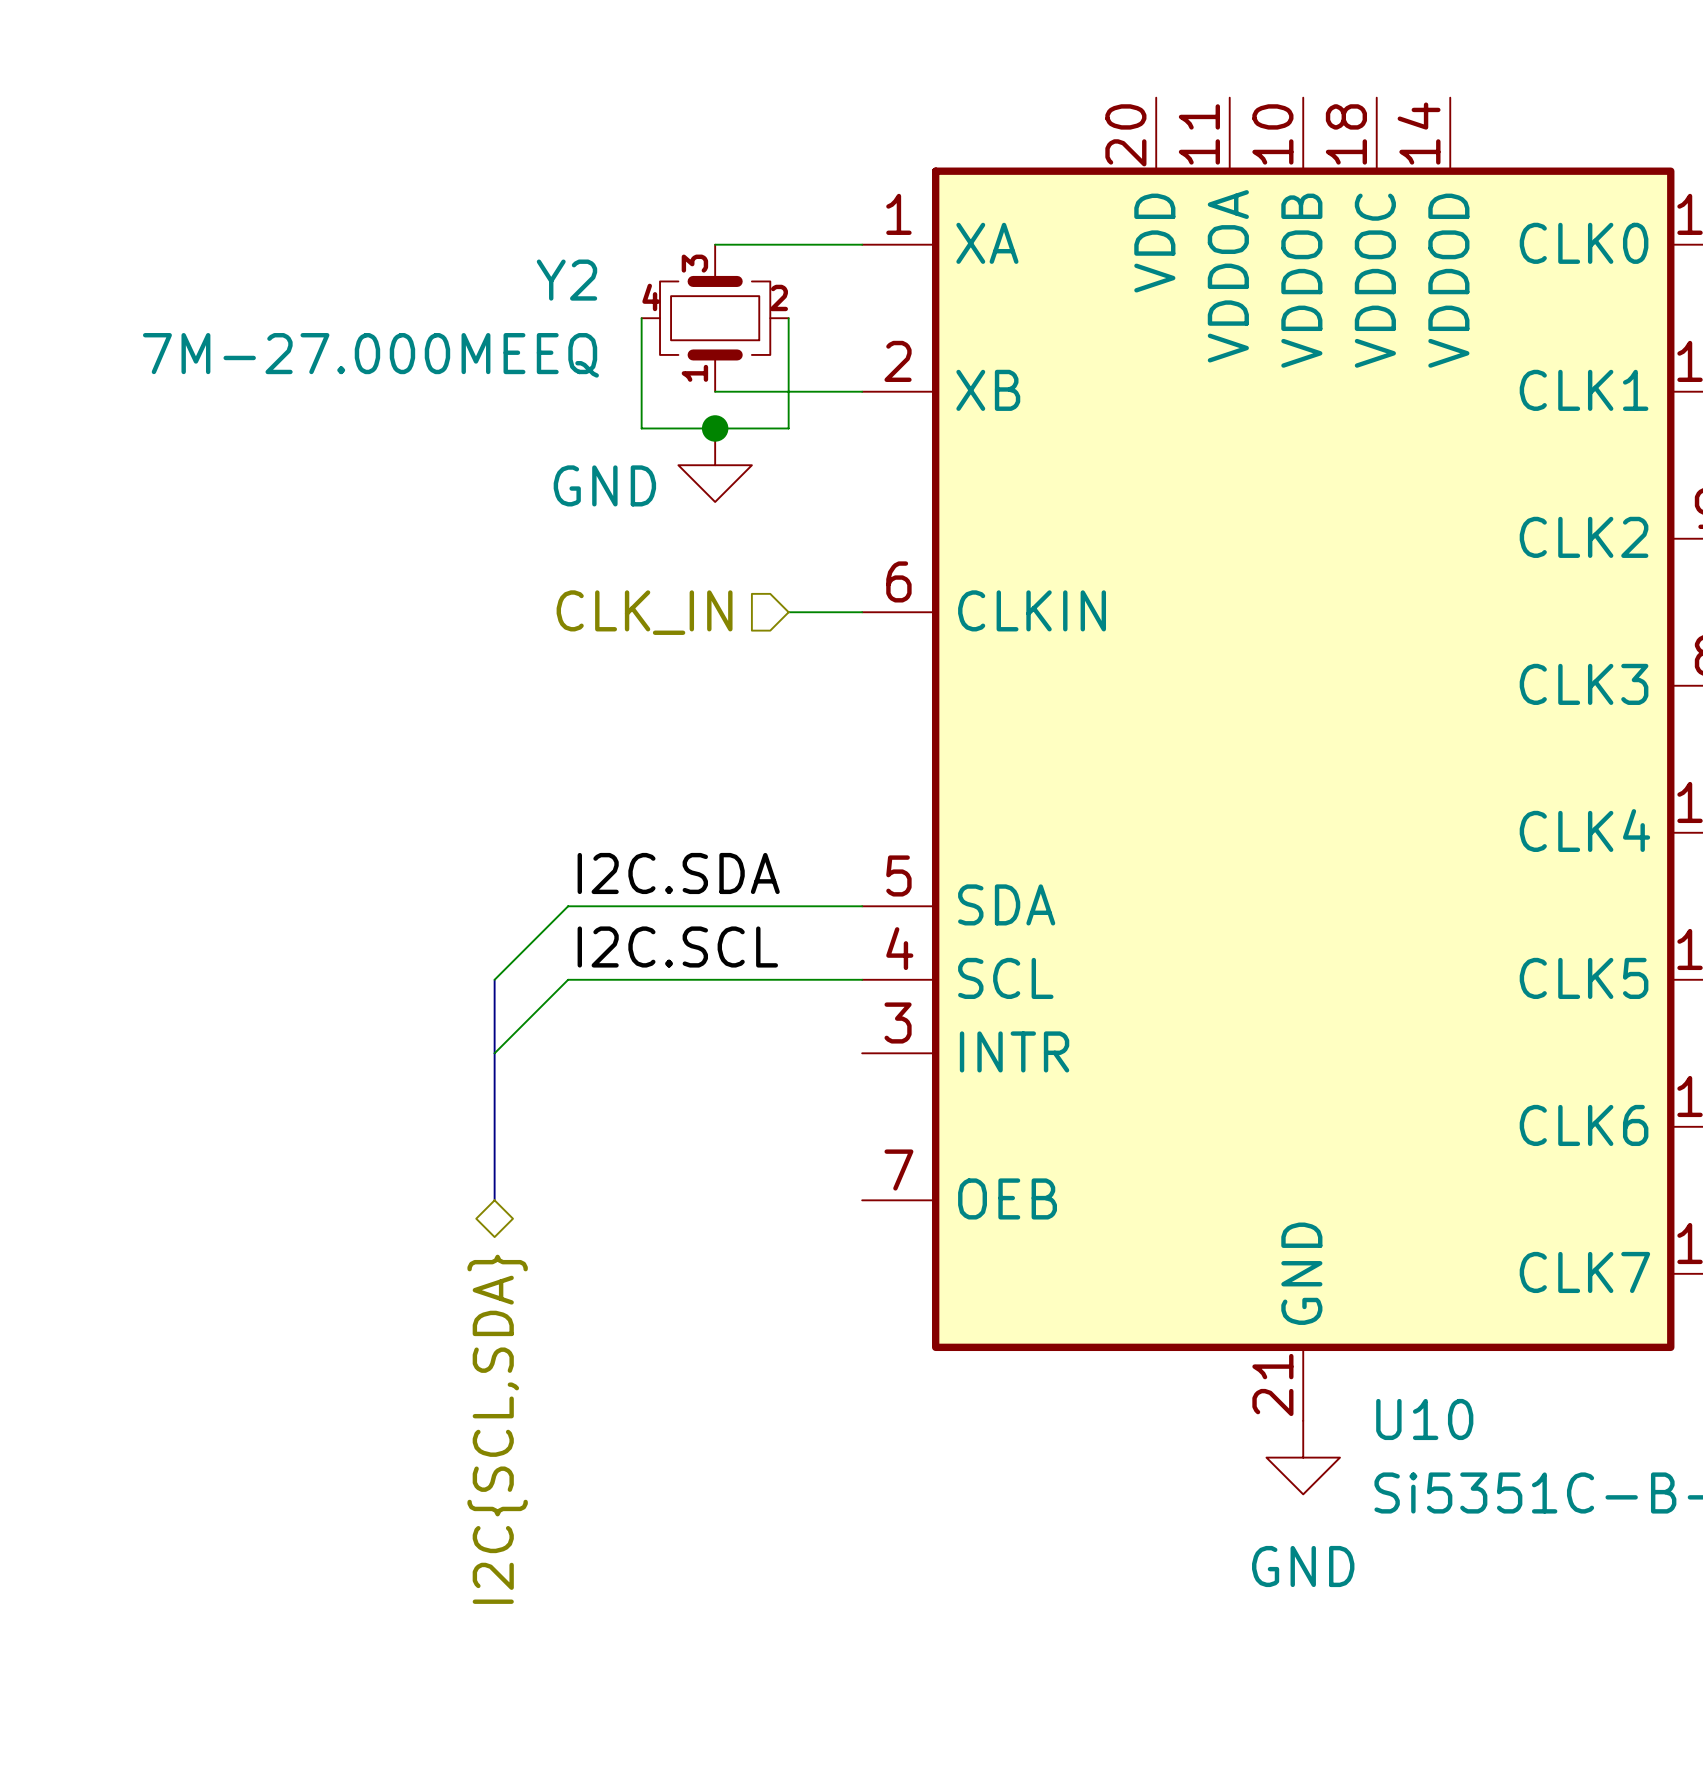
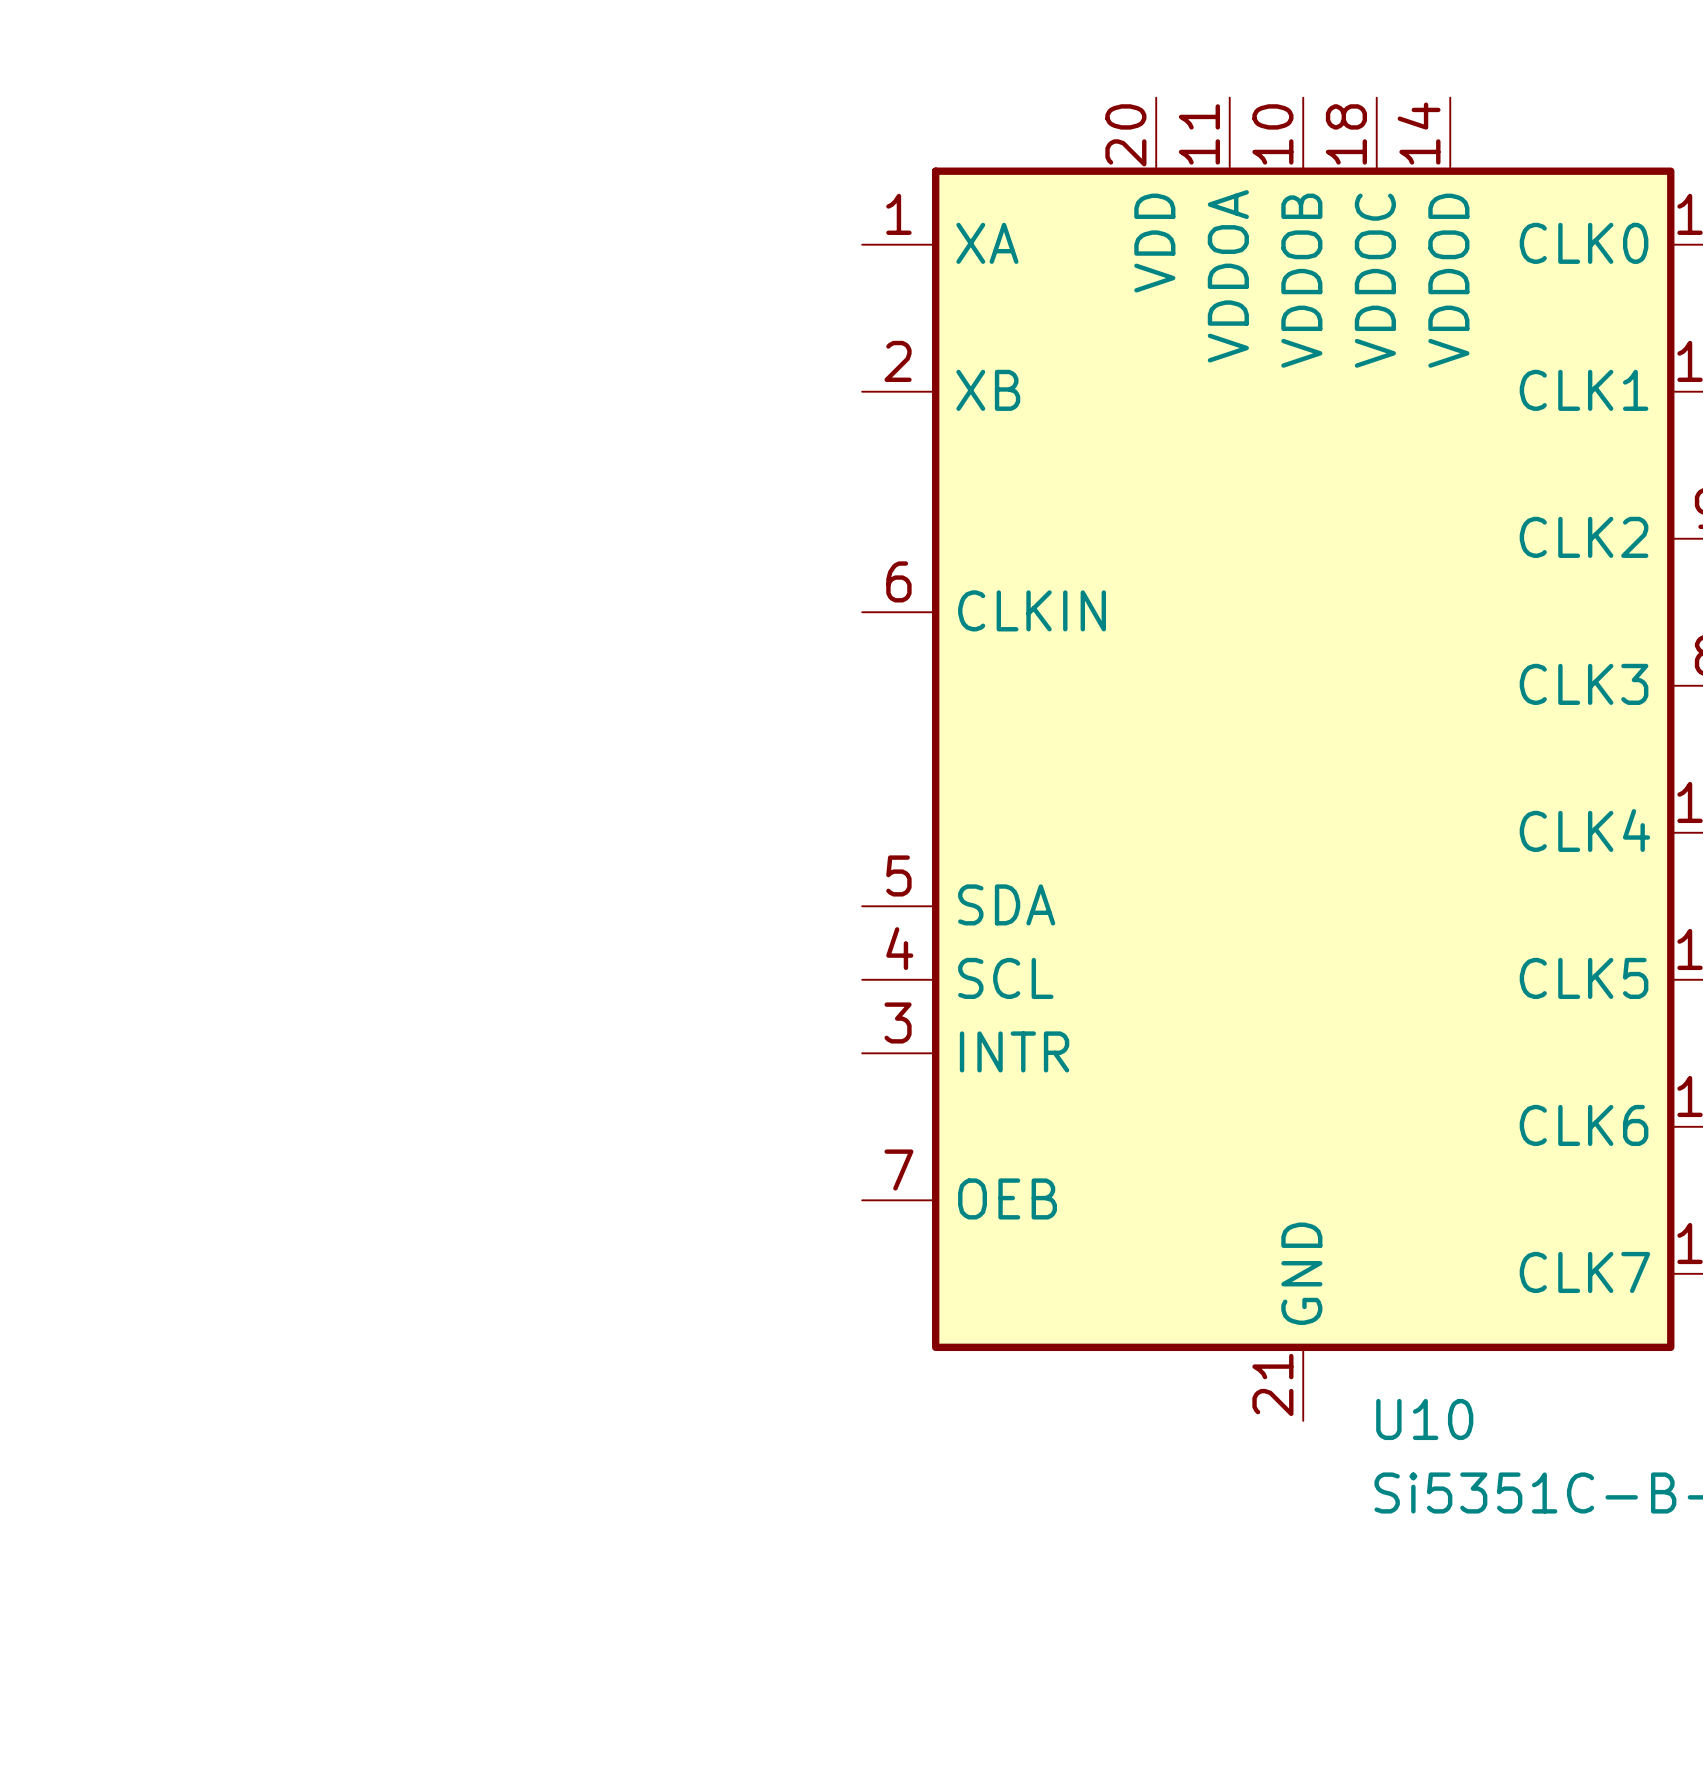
wire: (715, 244) (862, 244) -> none
wire: (641, 318) (641, 428) (788, 428) (788, 318) -> none
Y2: 7M-27.000MEEQ (715, 318) -> none
wire: (715, 391) (862, 391) -> none
junction: (715, 428) -> none
power symbol: GND (715, 465) -> none
hierarchical label: CLK_IN (644, 612) -> none
wire: (788, 612) (862, 612) -> none
label: I2C.SDA (678, 873) -> none
wire: (862, 906) (568, 906) (494, 979) -> none
label: I2C.SCL (677, 946) -> none
bus: (494, 979) (494, 1200) -> none
wire: (862, 979) (568, 979) (494, 1053) -> none
hierarchical label: I2C{SCL,SDA} (497, 1429) -> none
power symbol: GND (1303, 1457) -> none

